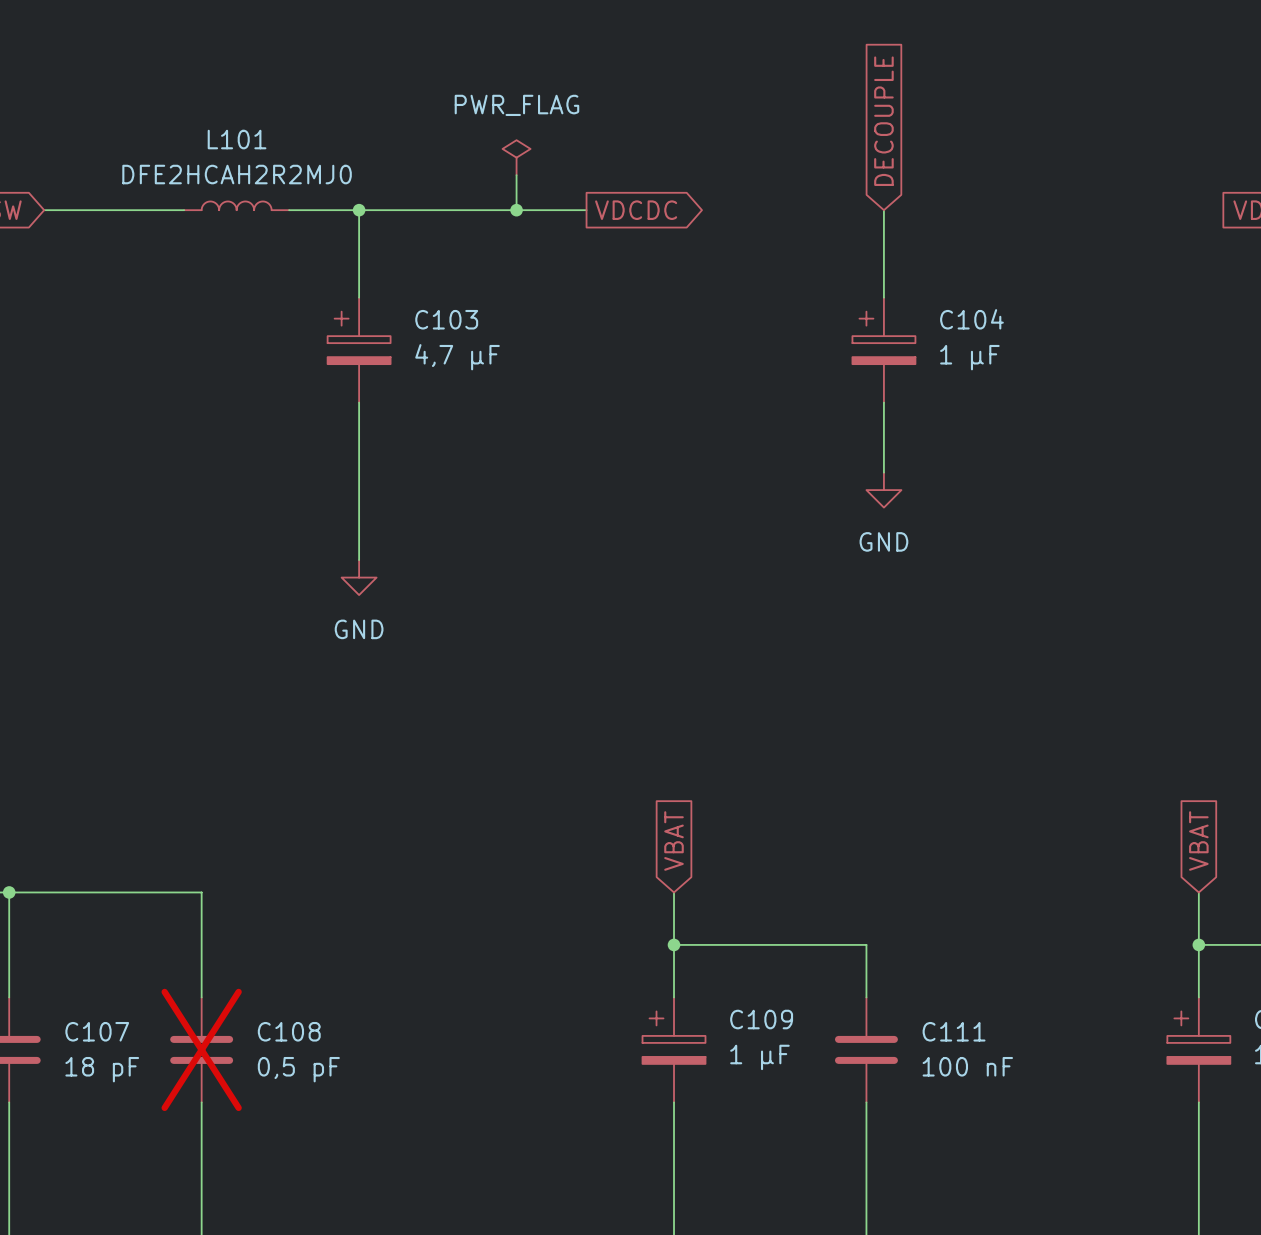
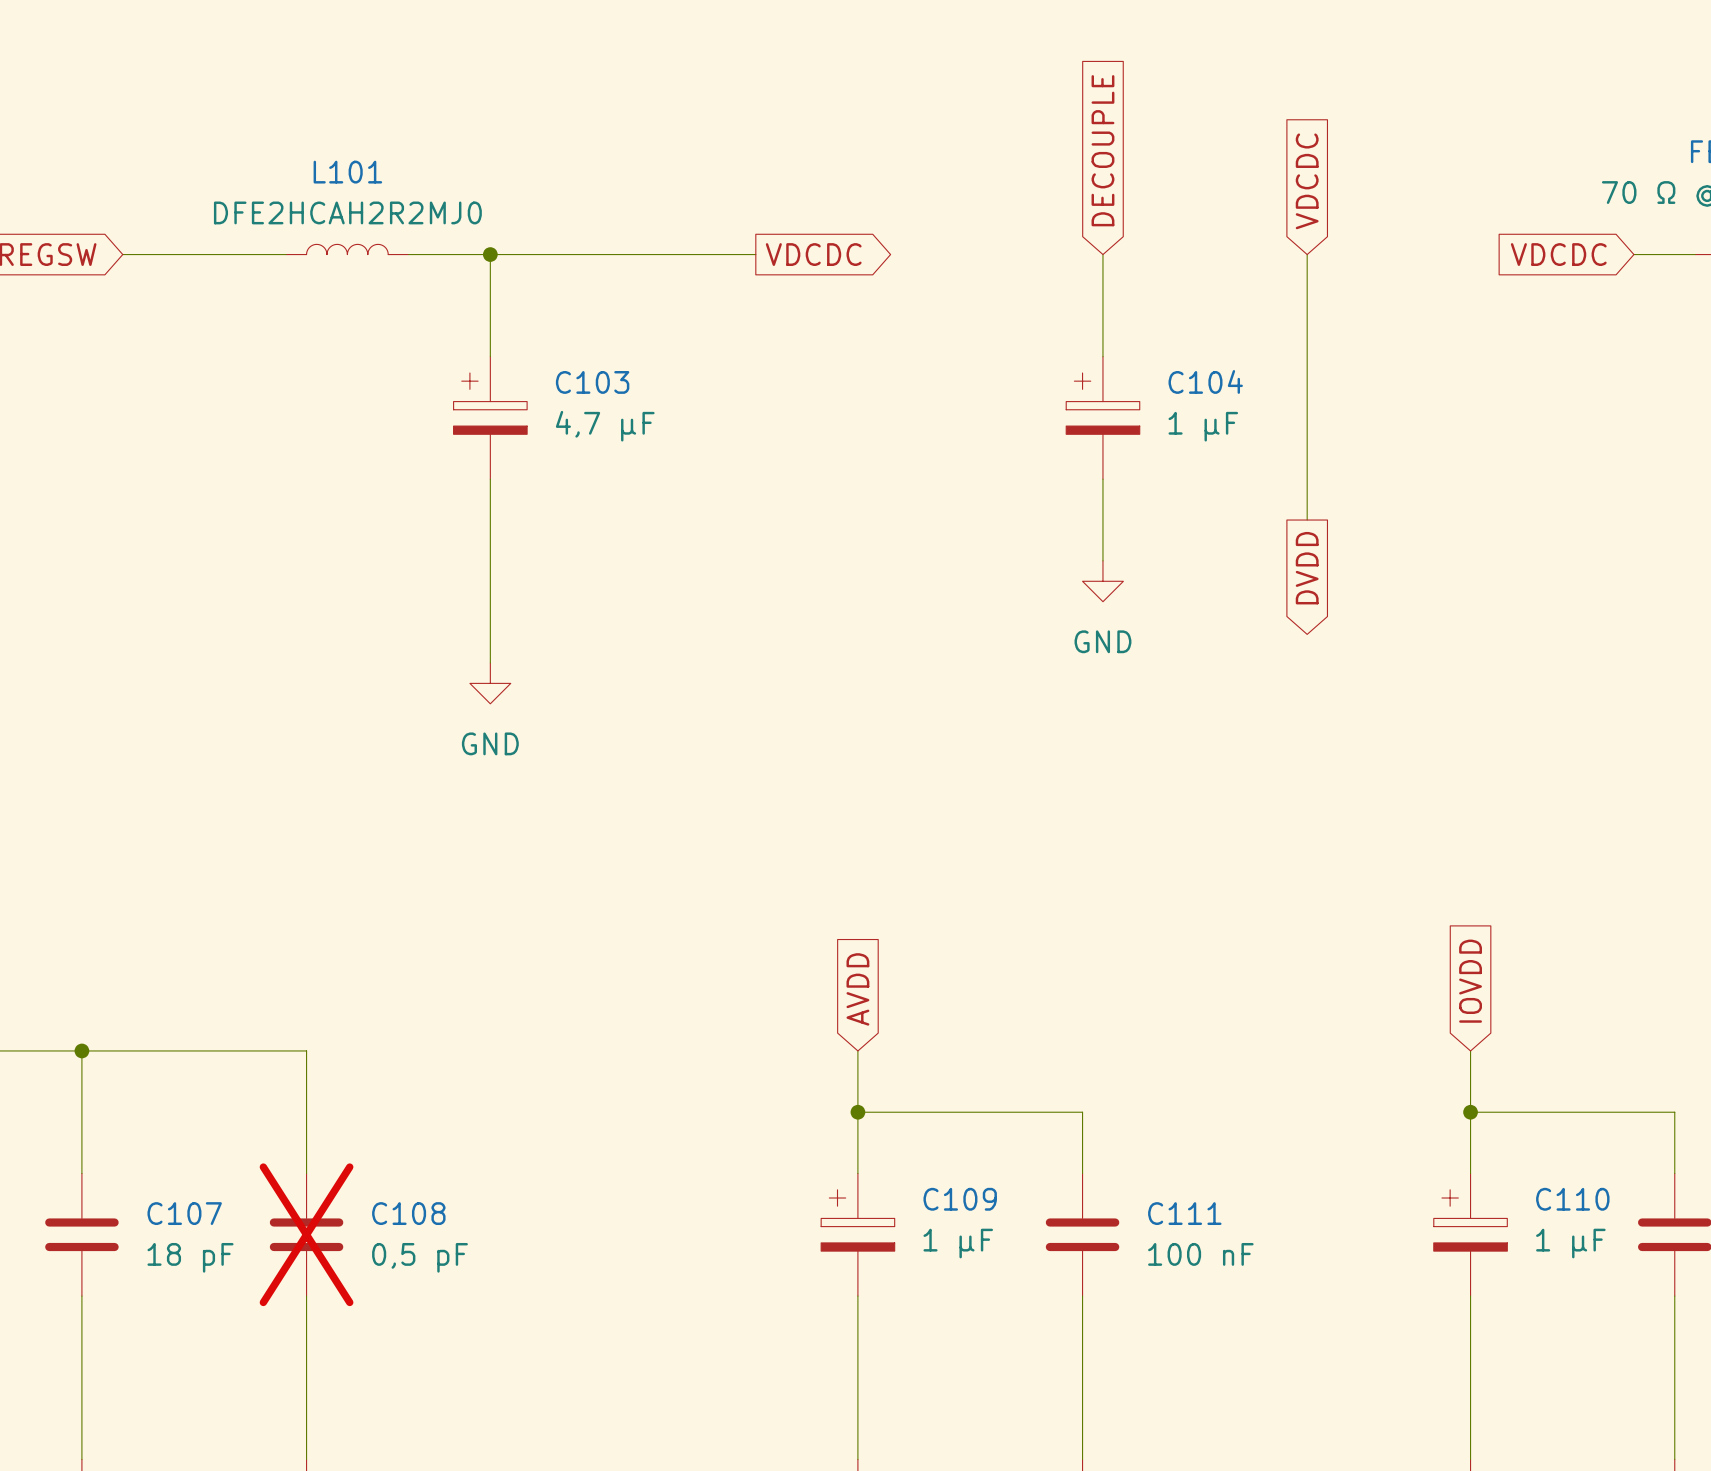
global label: none -> VDCDC (1307, 181)
power symbol: PWR_FLAG (516, 157) -> none
wire: (516, 175) (516, 210) -> none
junction: (516, 210) -> none
wire: none -> (1307, 254) (1307, 520)
global label: none -> DVDD (1307, 568)
global label: VBAT (674, 840) -> AVDD (857, 989)
global label: VBAT (1198, 840) -> IOVDD (1470, 981)

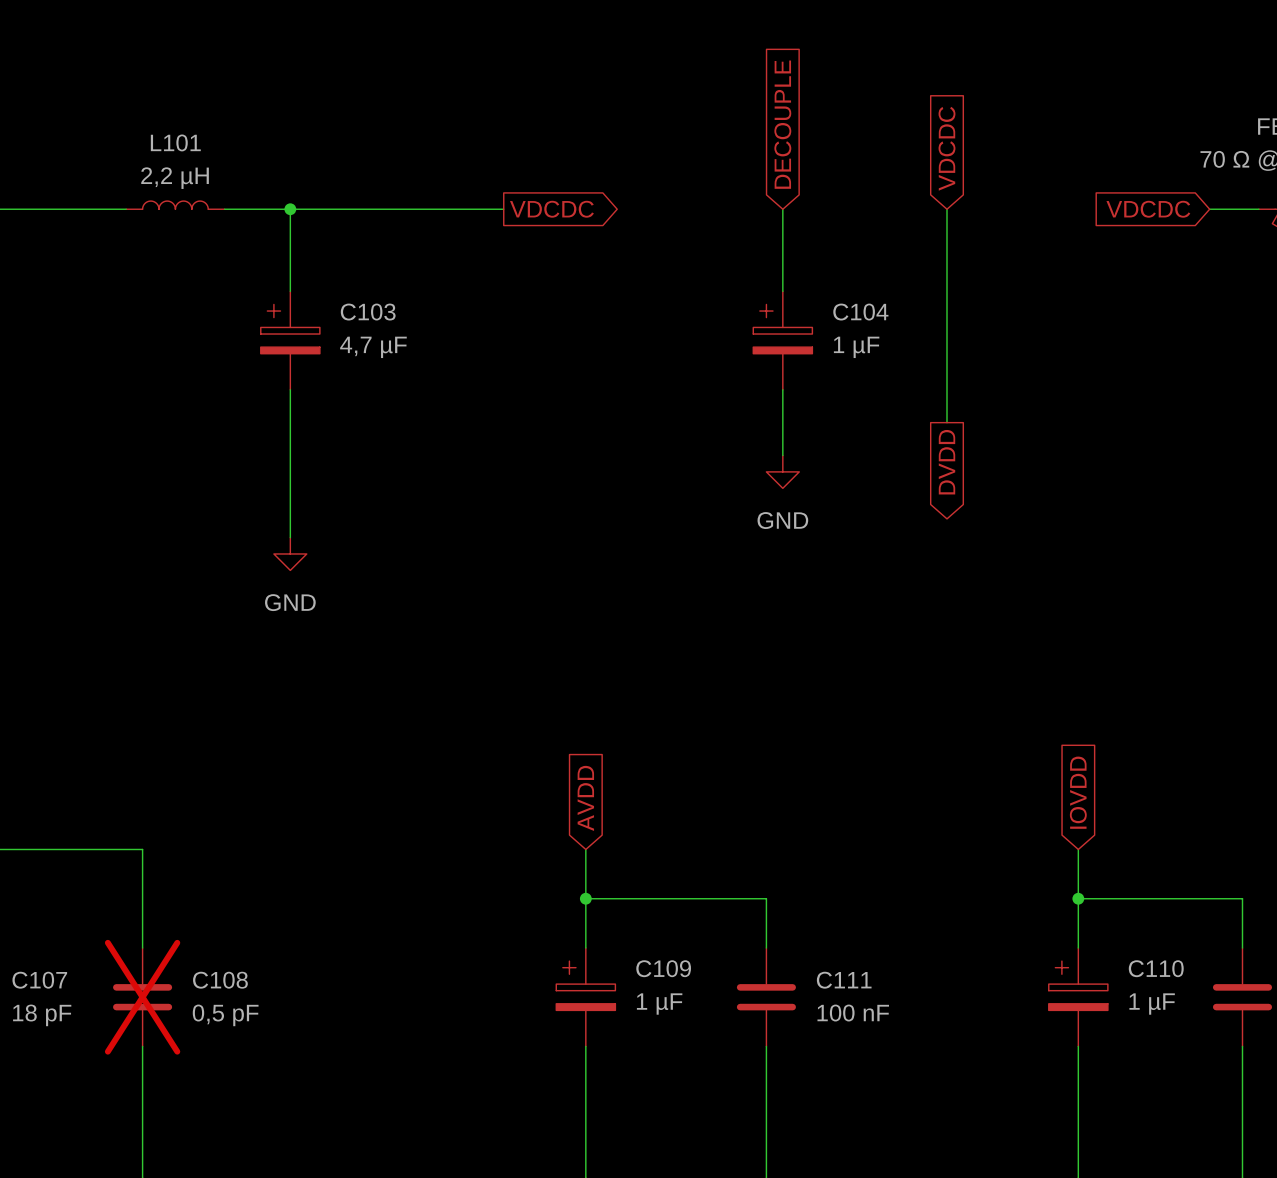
L101 value: DFE2HCAH2R2MJ0 (347, 212) -> 2,2 µH (175, 178)

